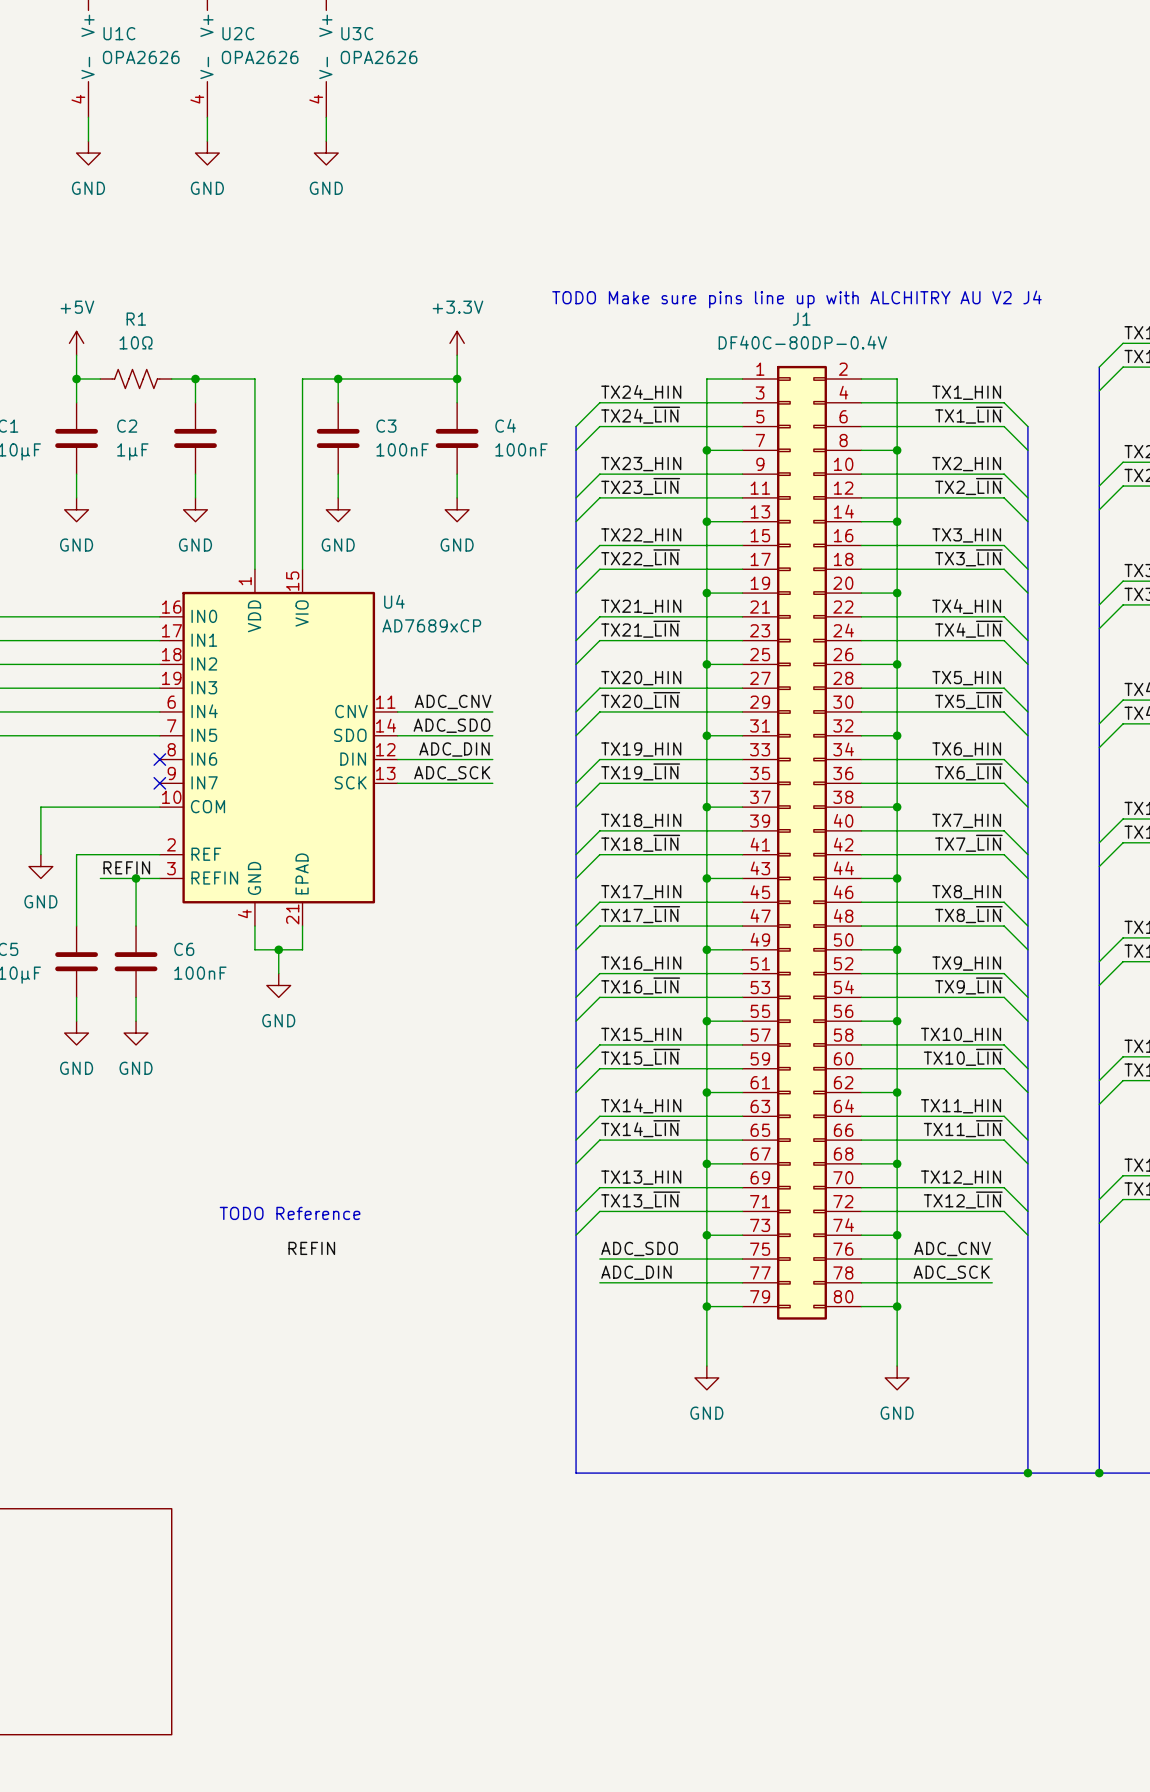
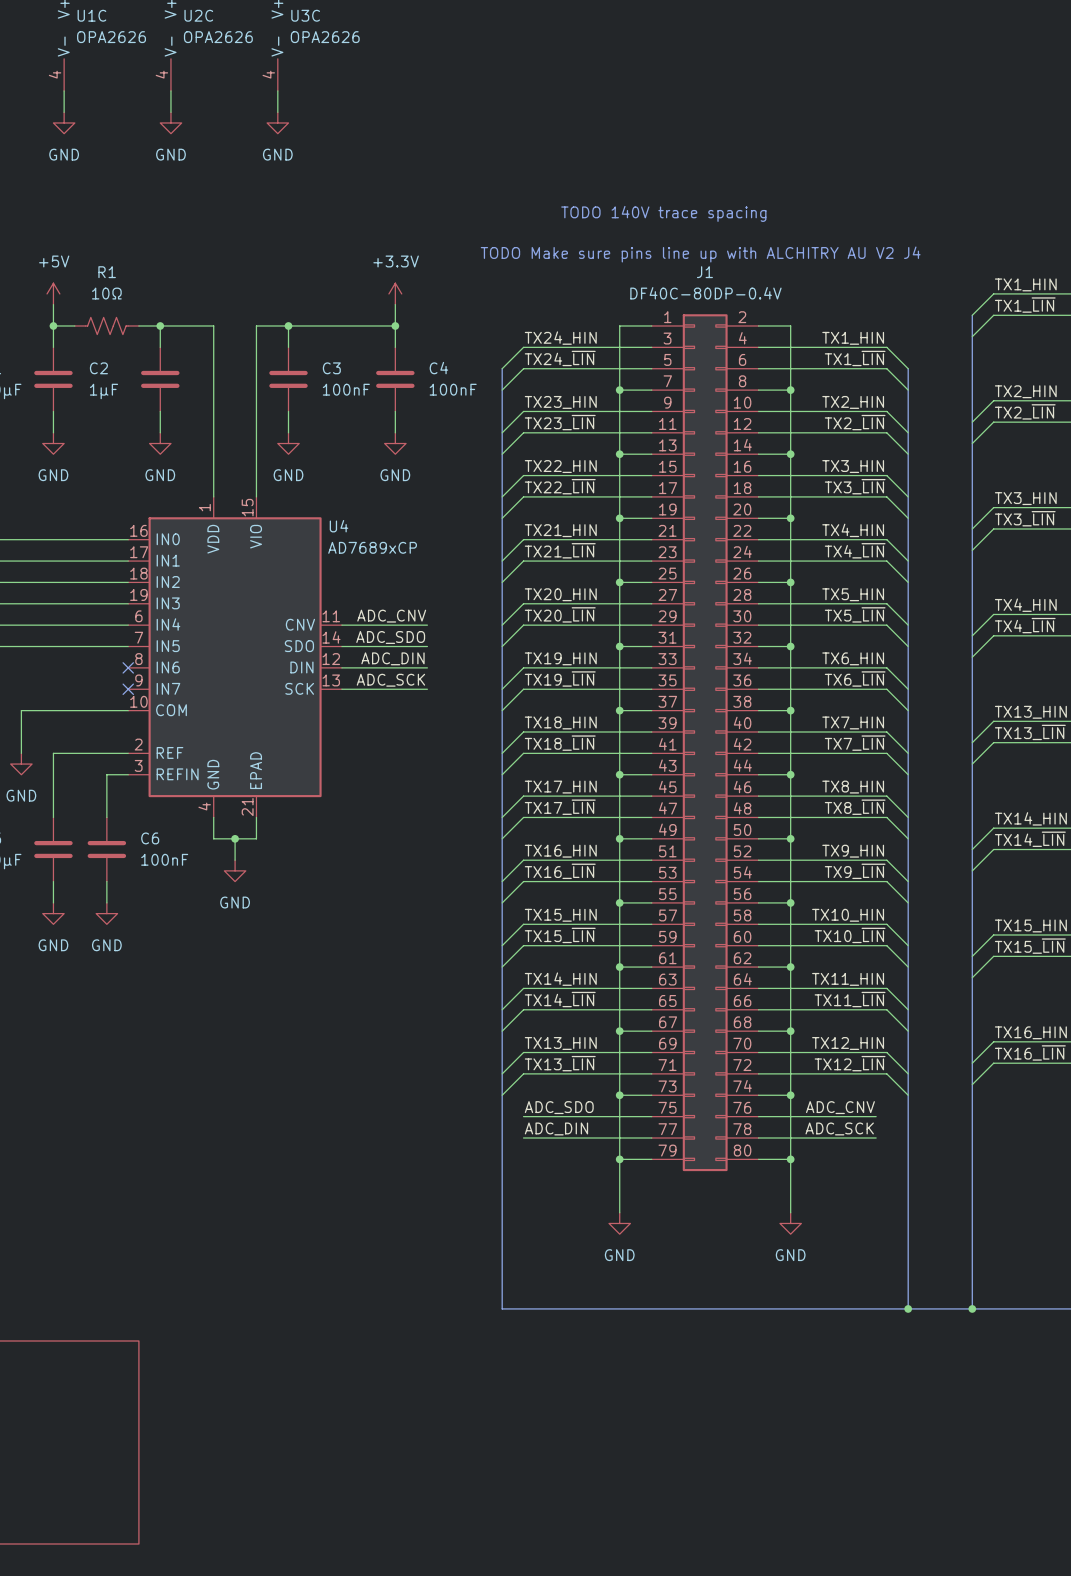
text: none -> TODO 140V trace spacing (663, 213)
label: REFIN (126, 867) -> none
wire: (100, 878) (136, 878) -> none
junction: (136, 878) -> none
text: TODO Reference (290, 1213) -> none
label: REFIN (311, 1248) -> none

